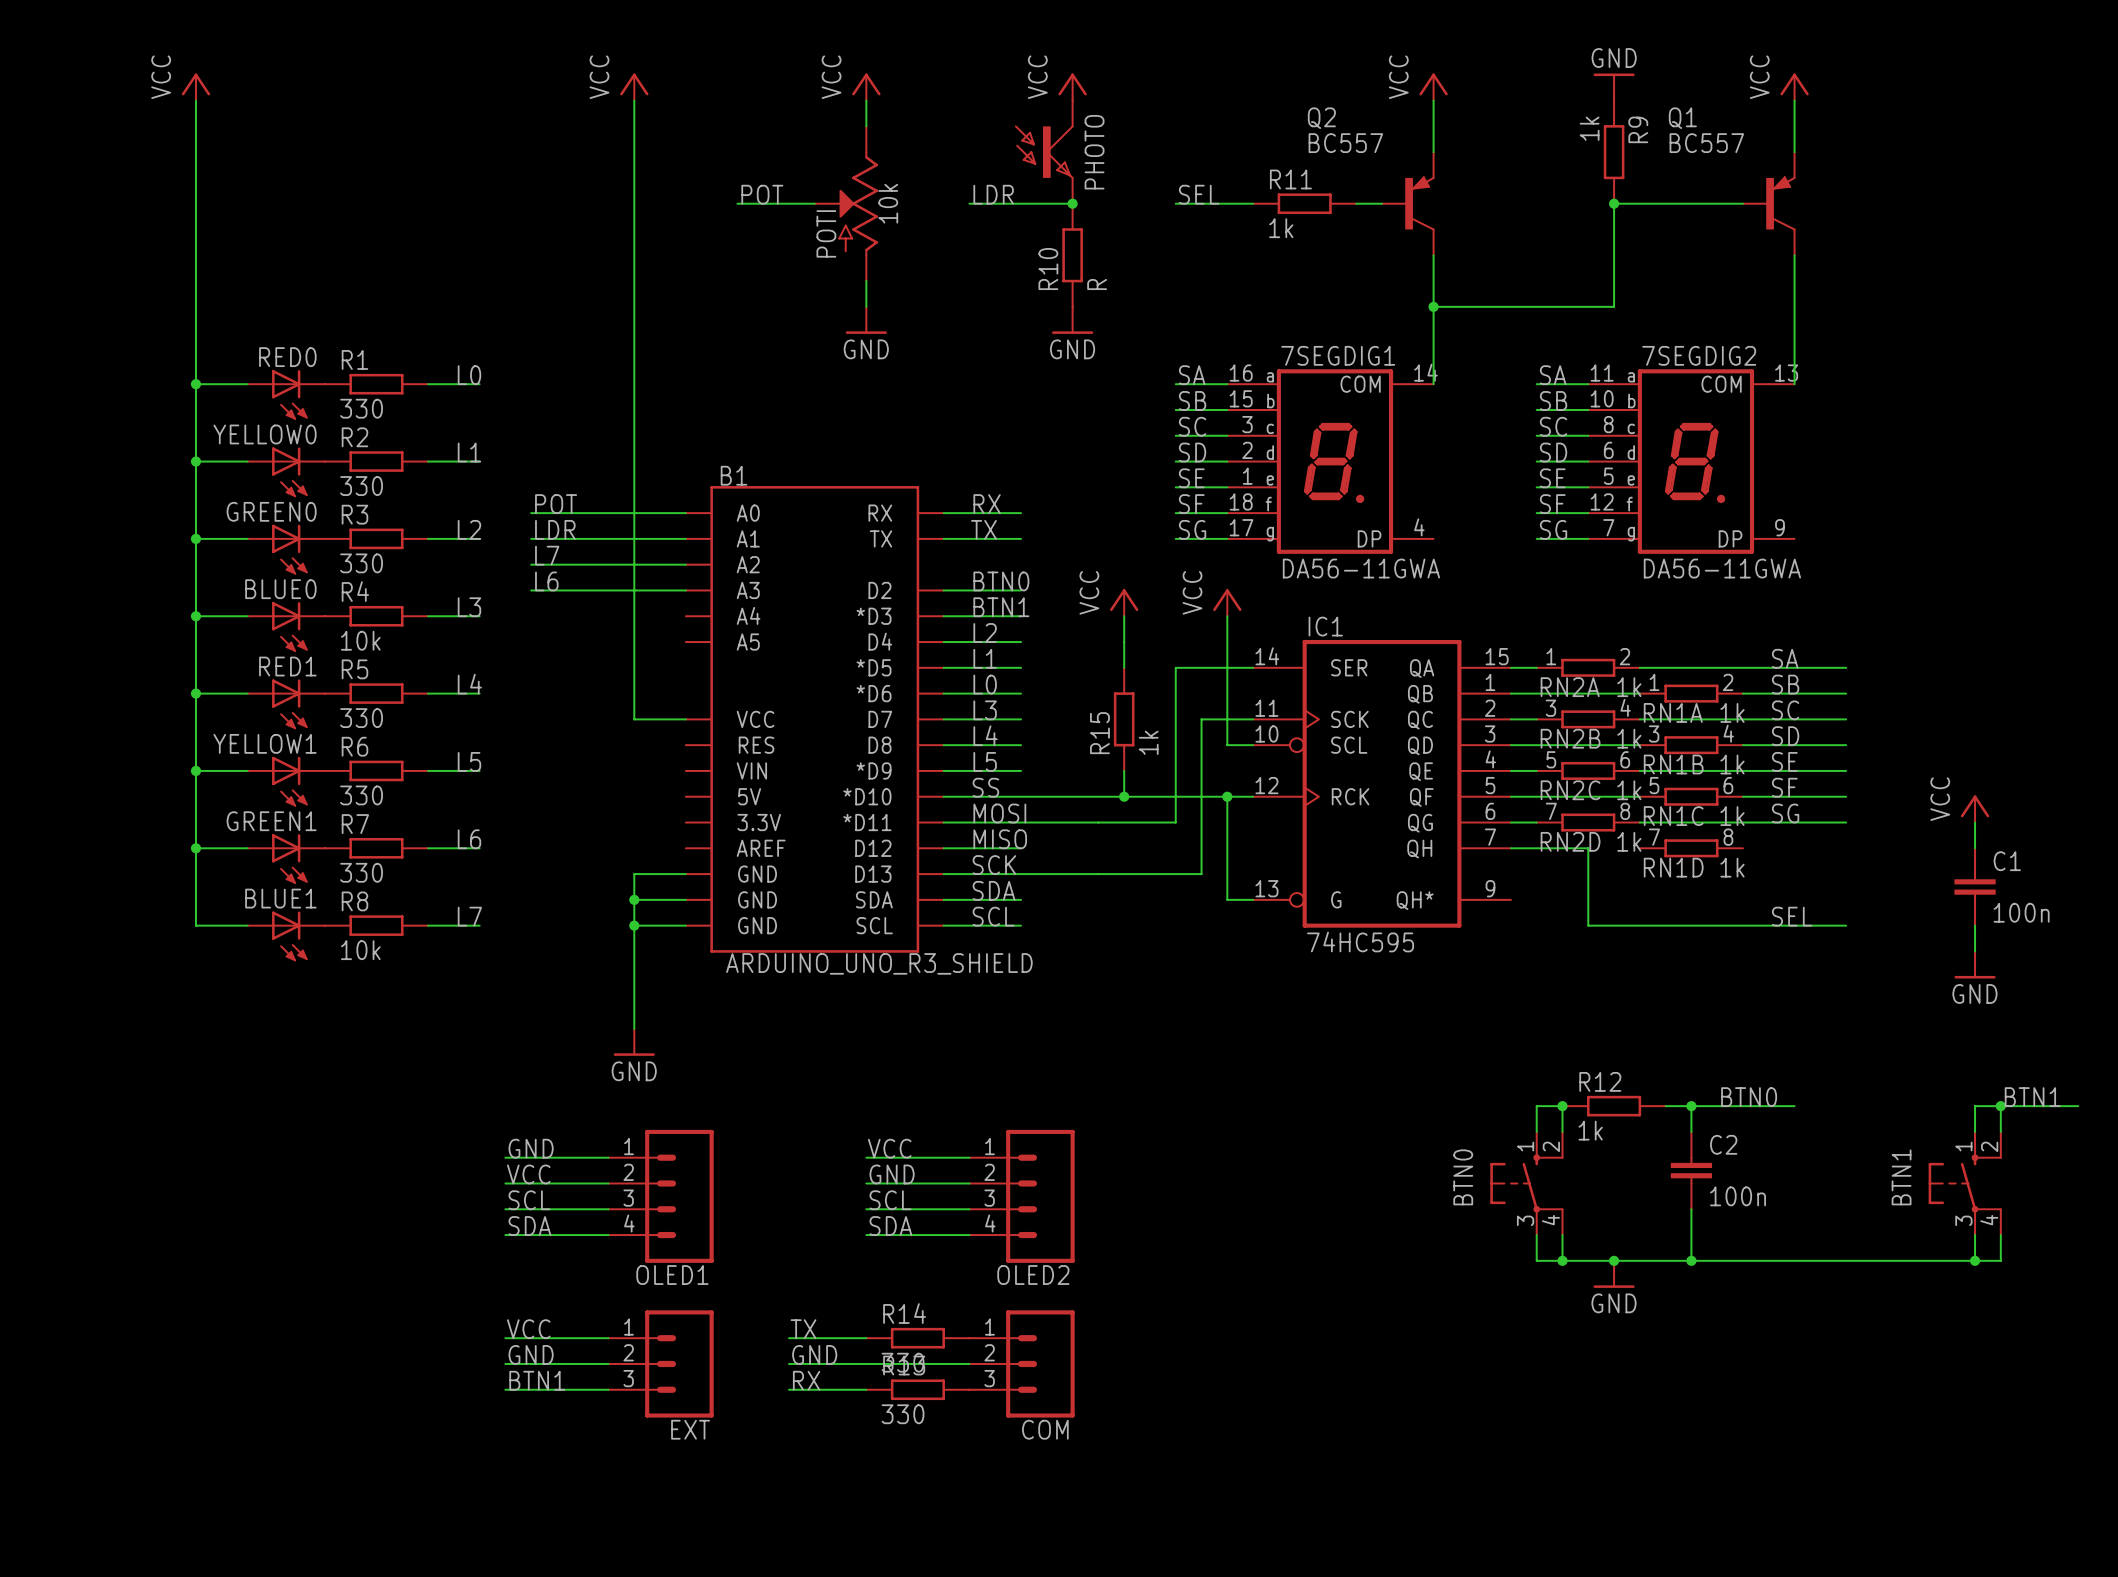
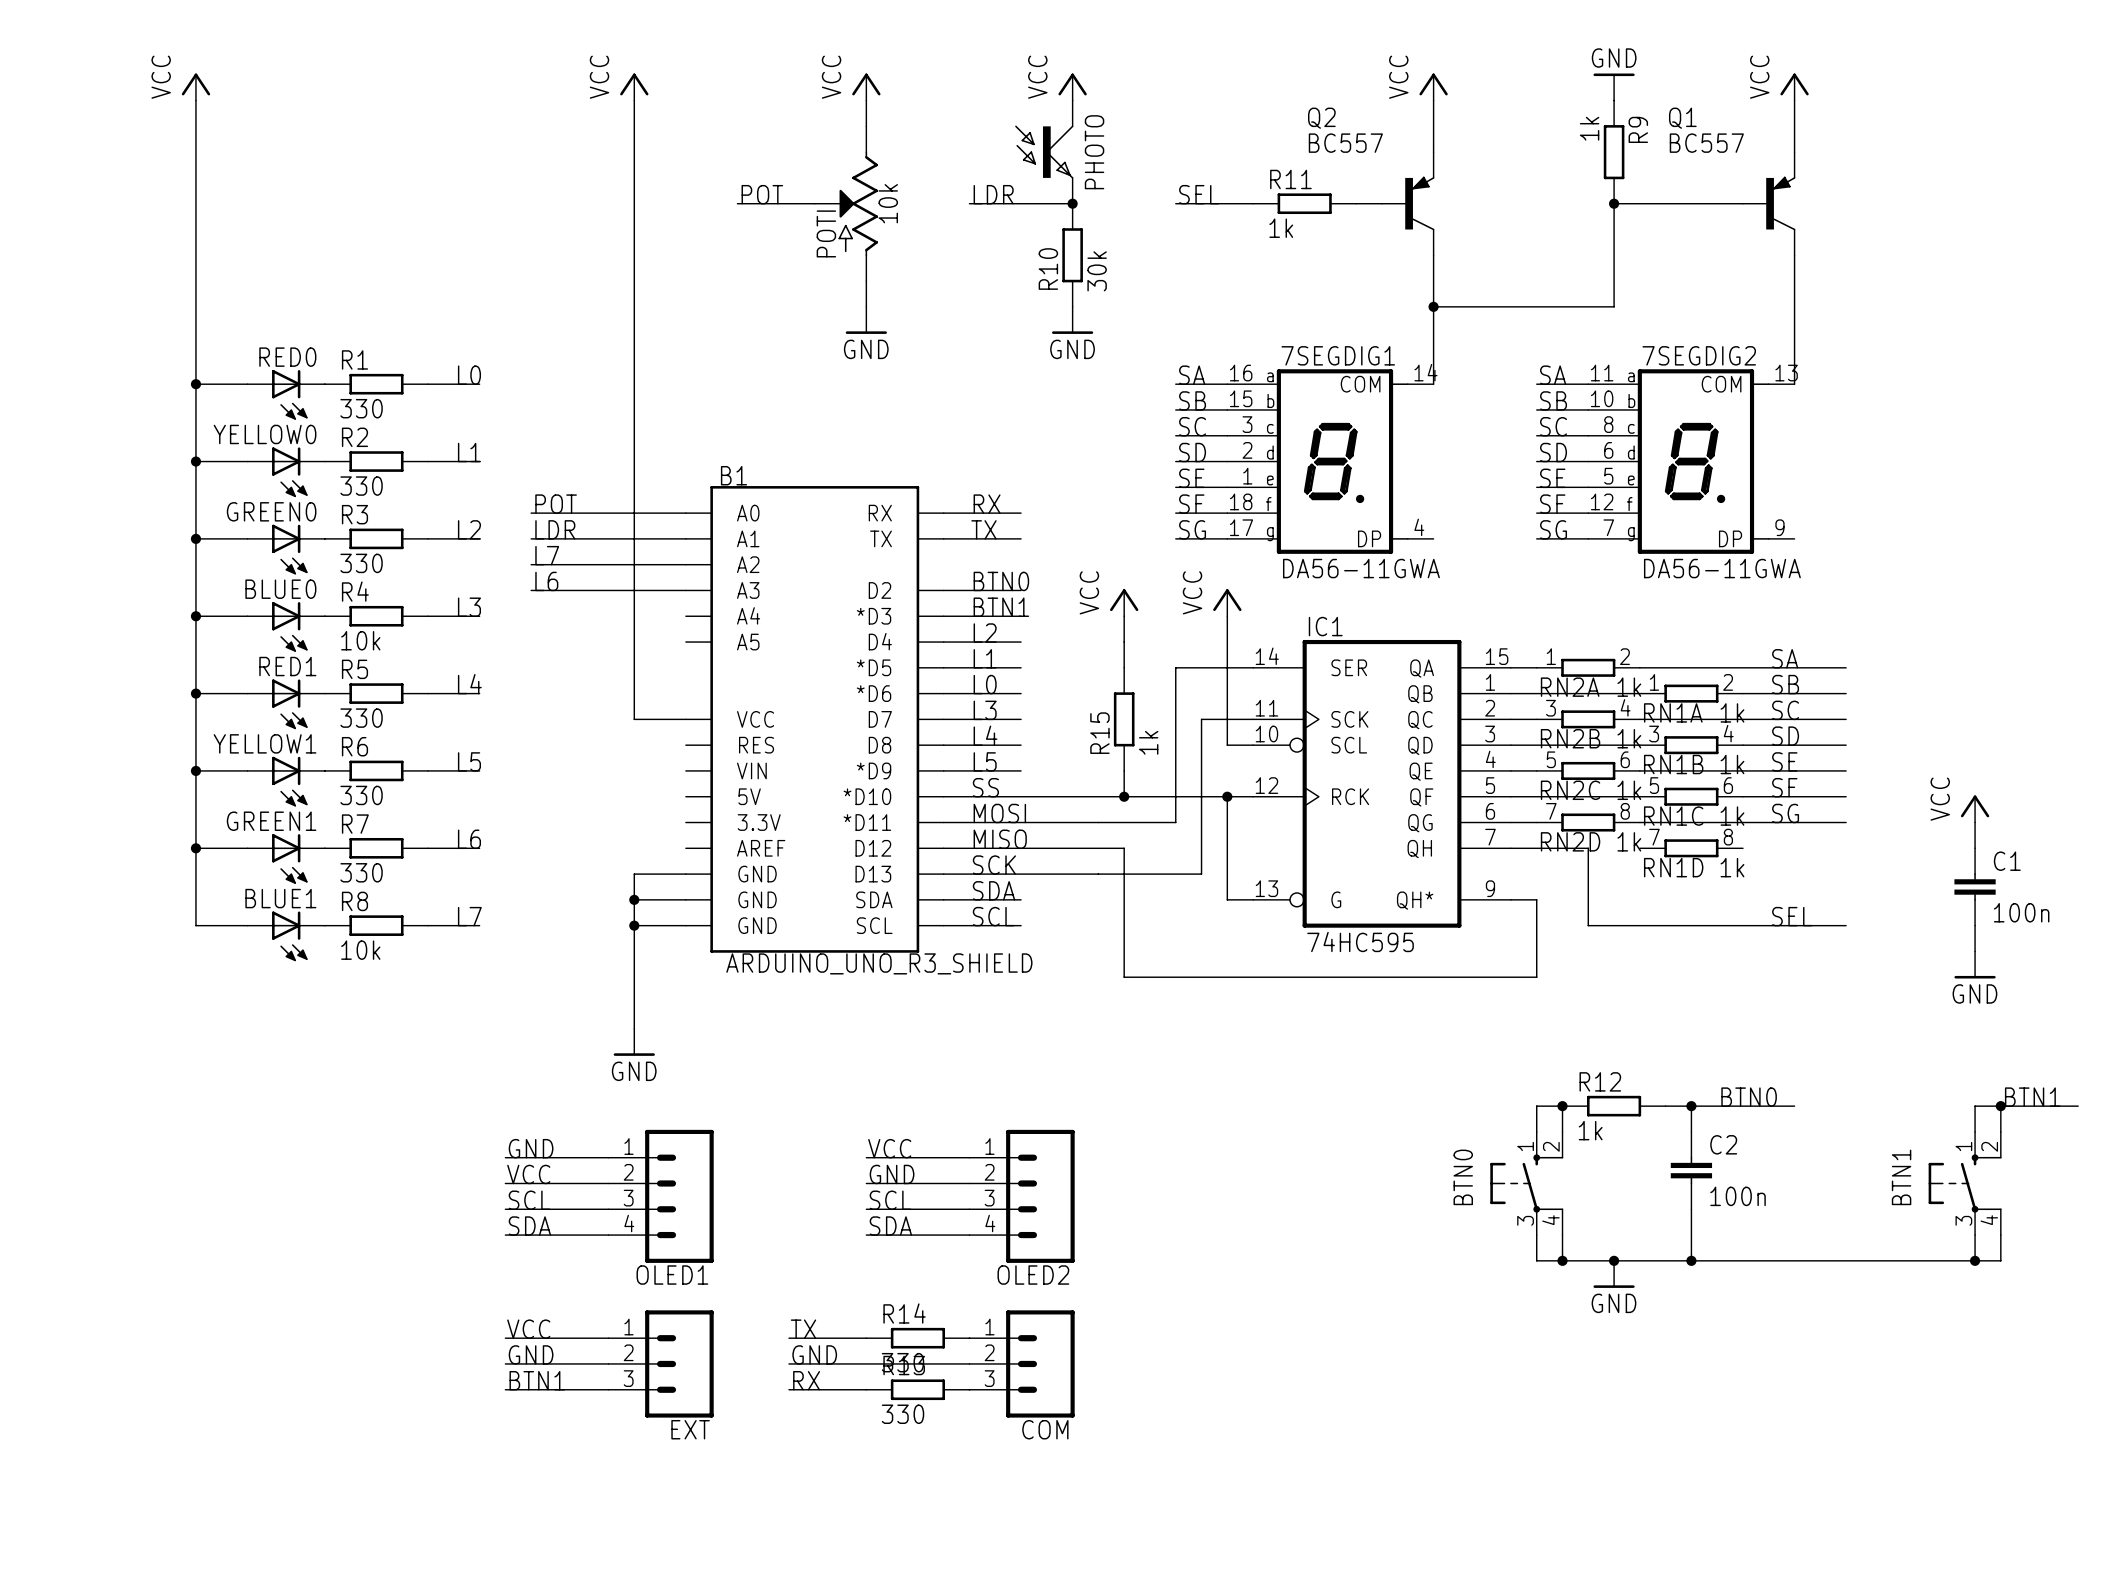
R10 value: R (1097, 284) -> 30k (1097, 271)
wire: none -> (1021, 848) (1124, 848) (1124, 977) (1536, 977) (1536, 899) (1510, 899)

